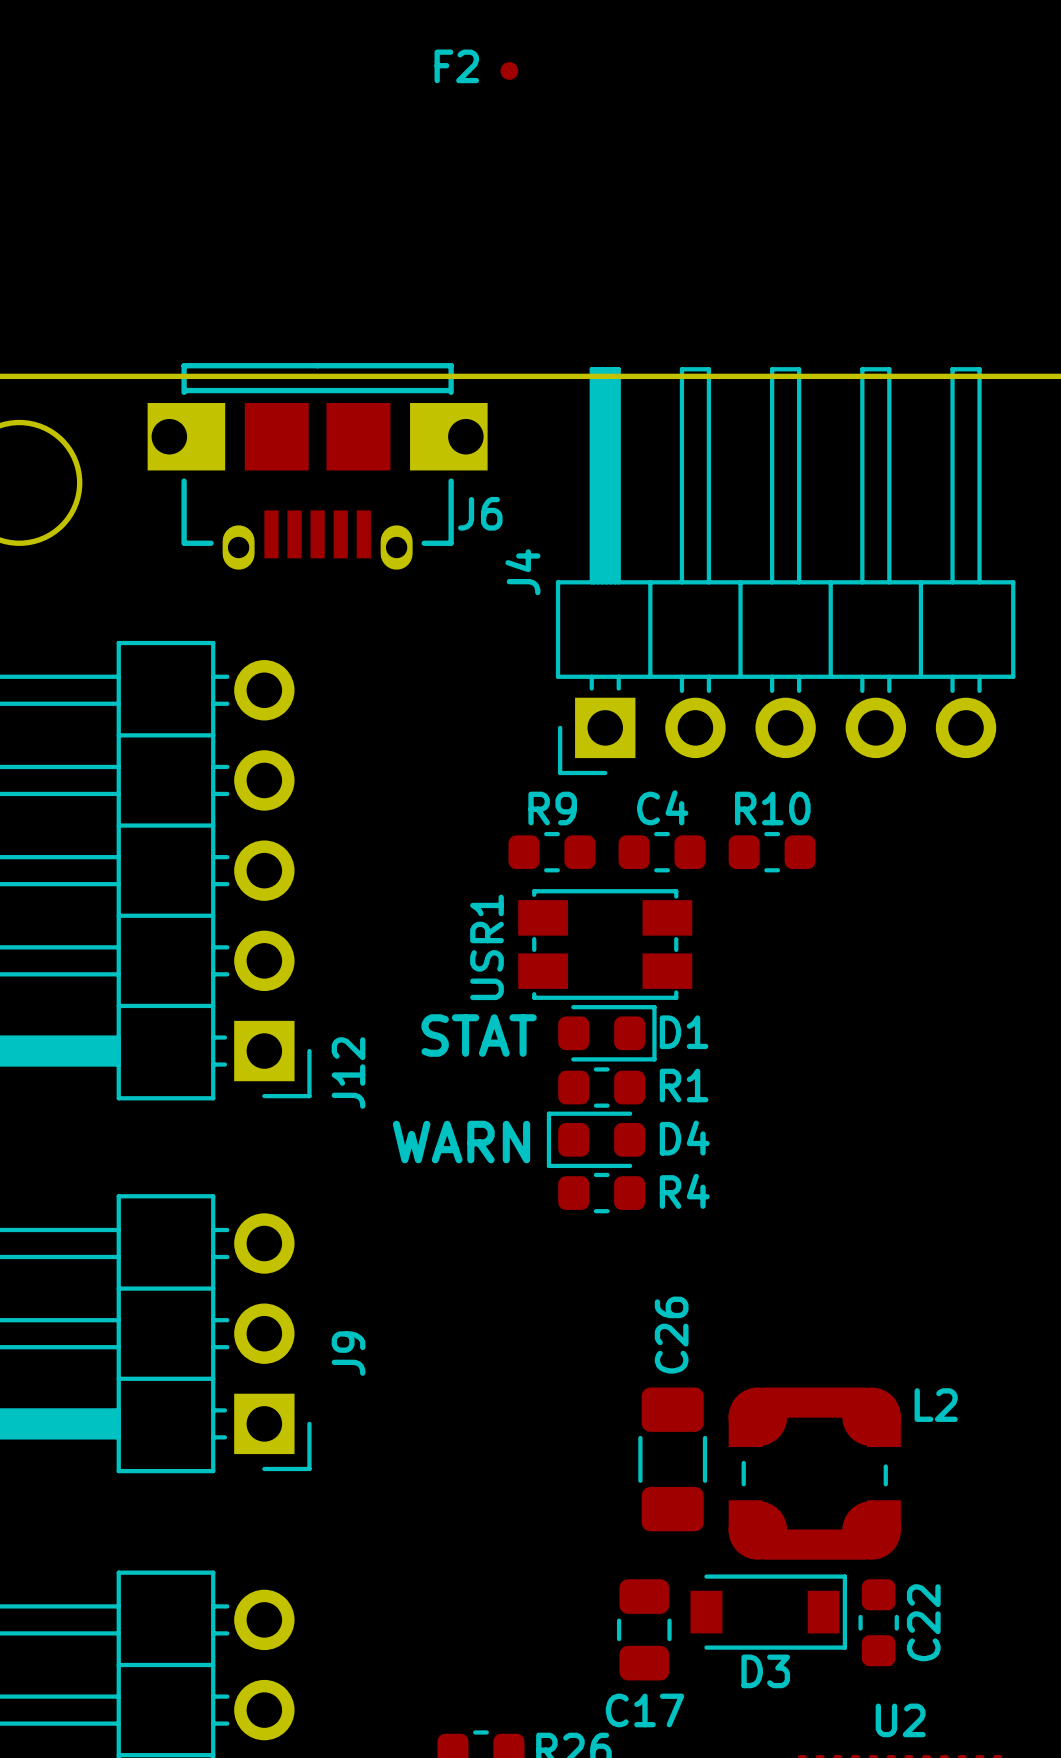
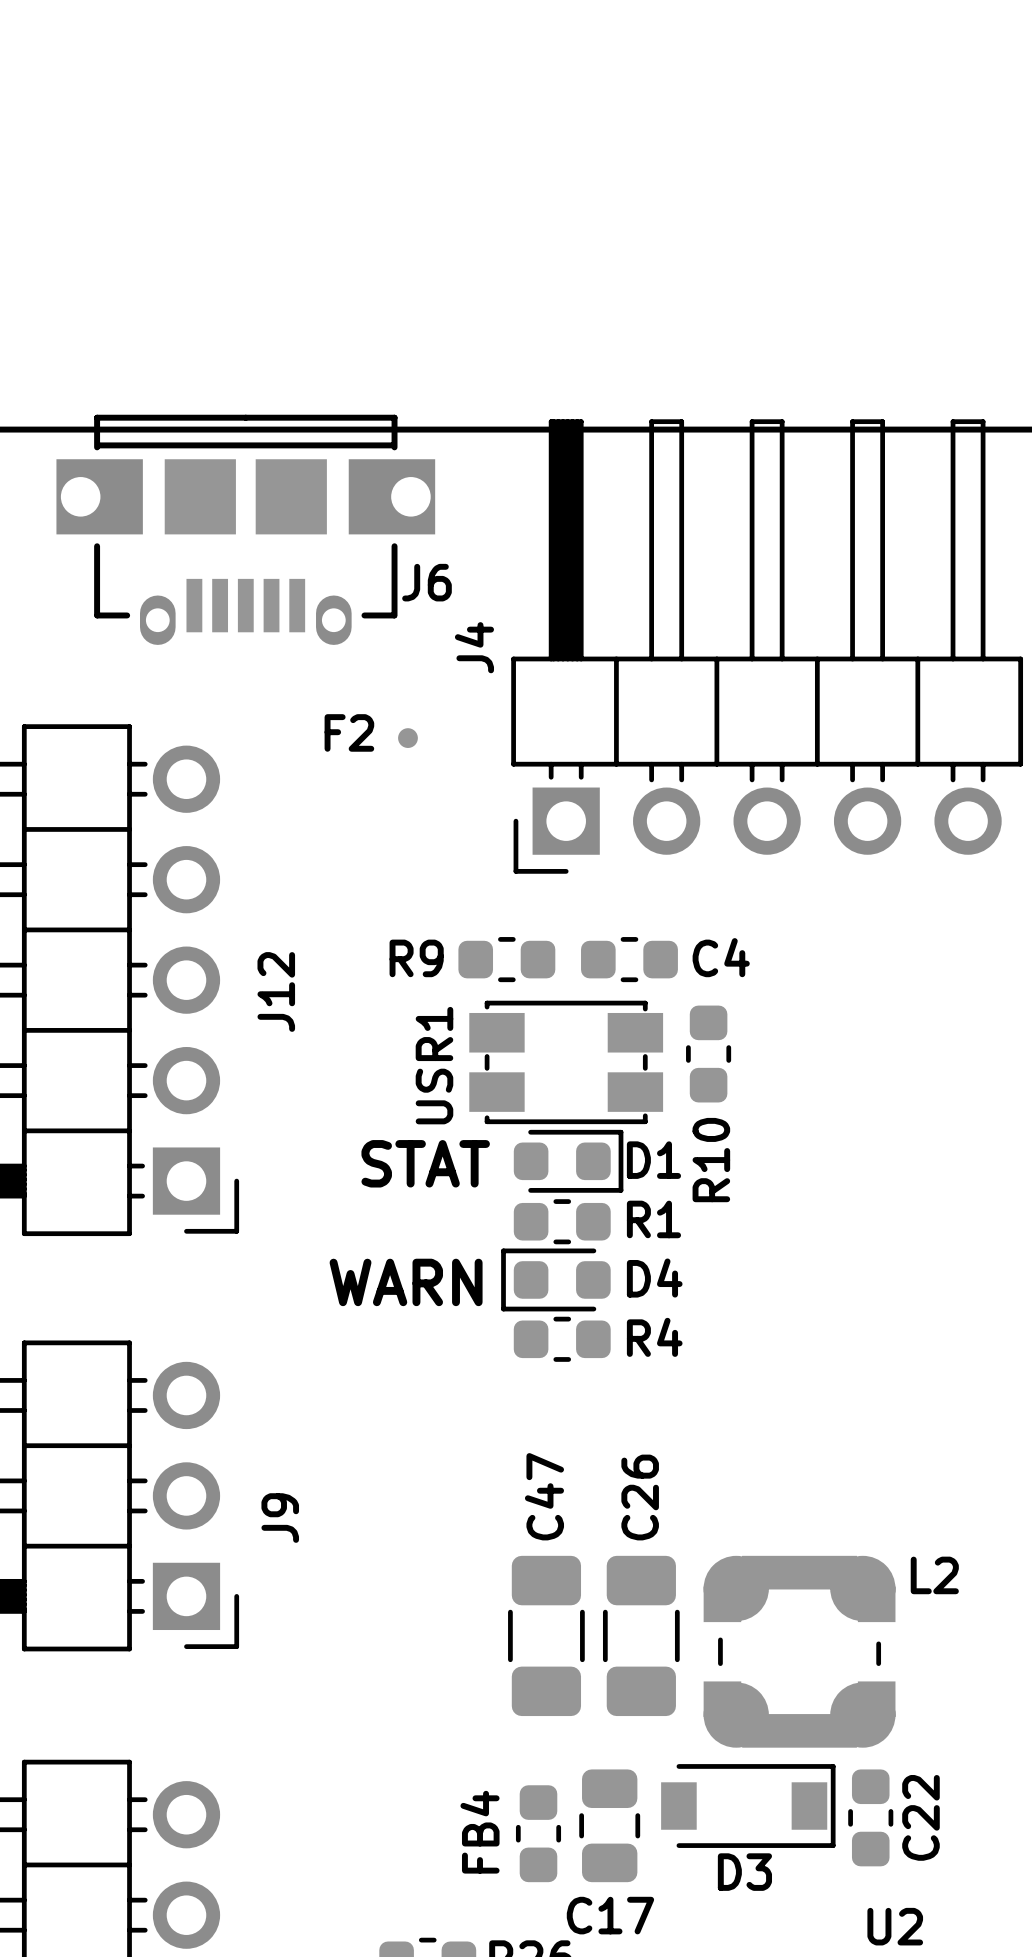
F2 position: (509, 70) -> (407, 738)
C4 name position: C4 (662, 807) -> C4 (721, 957)
R9 name position: R9 (552, 808) -> R9 (416, 958)
R10 name position: R10 (772, 808) -> R10 (711, 1160)
R10 rotation: 0° (772, 852) -> 90° clockwise (708, 1054)
R10 position: (772, 852) -> (708, 1054)
J12 name position: J12 (348, 1073) -> J12 (276, 991)
C47: none -> (546, 1635)
FB4: none -> (538, 1833)

